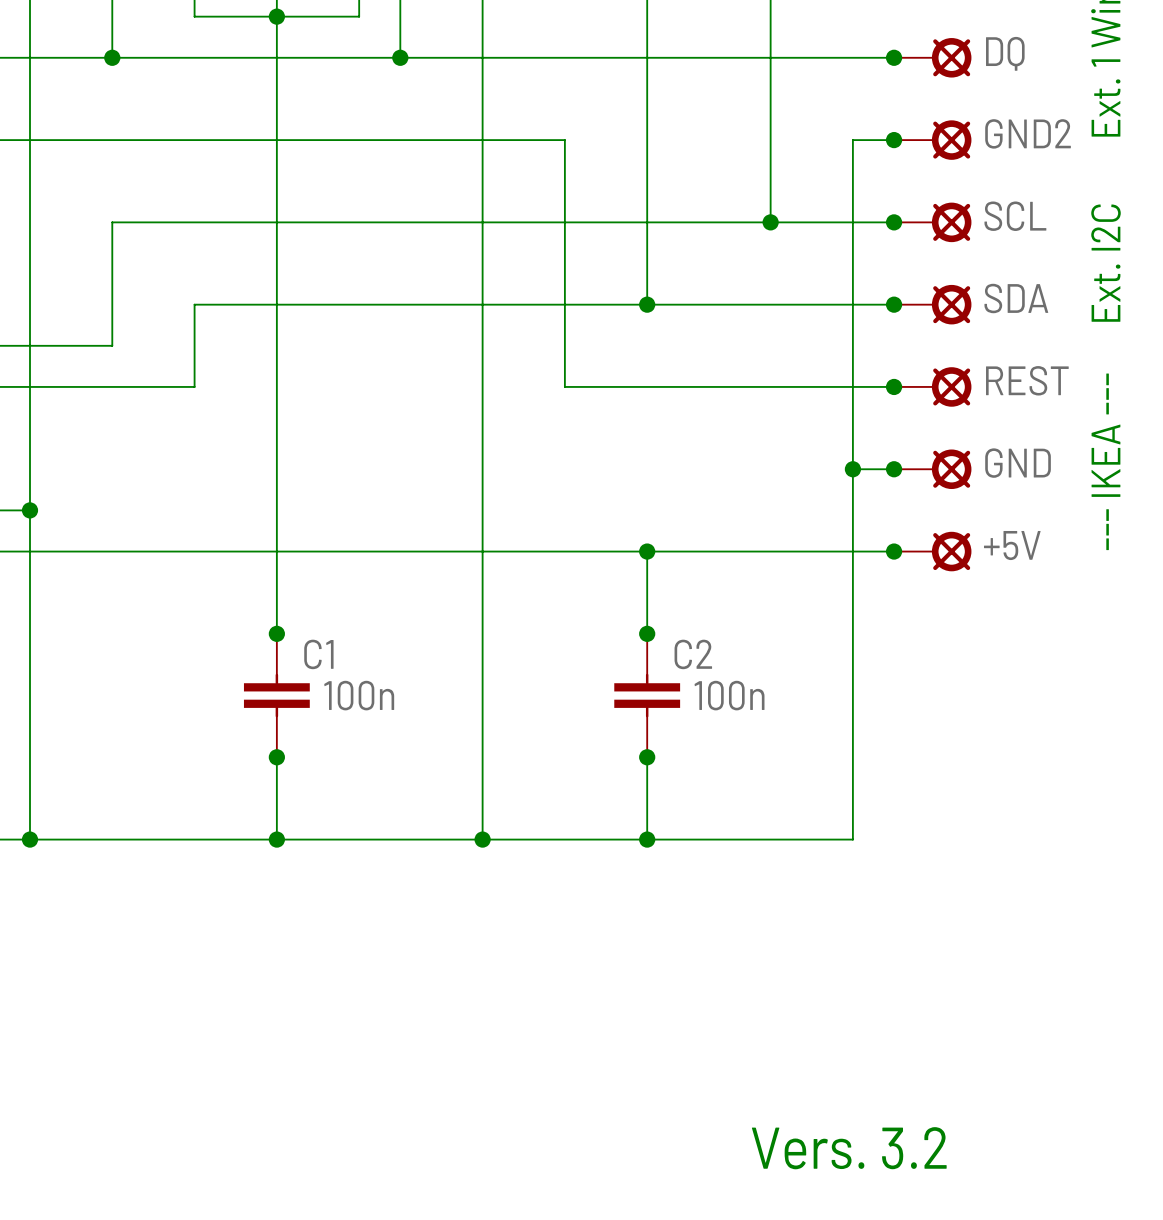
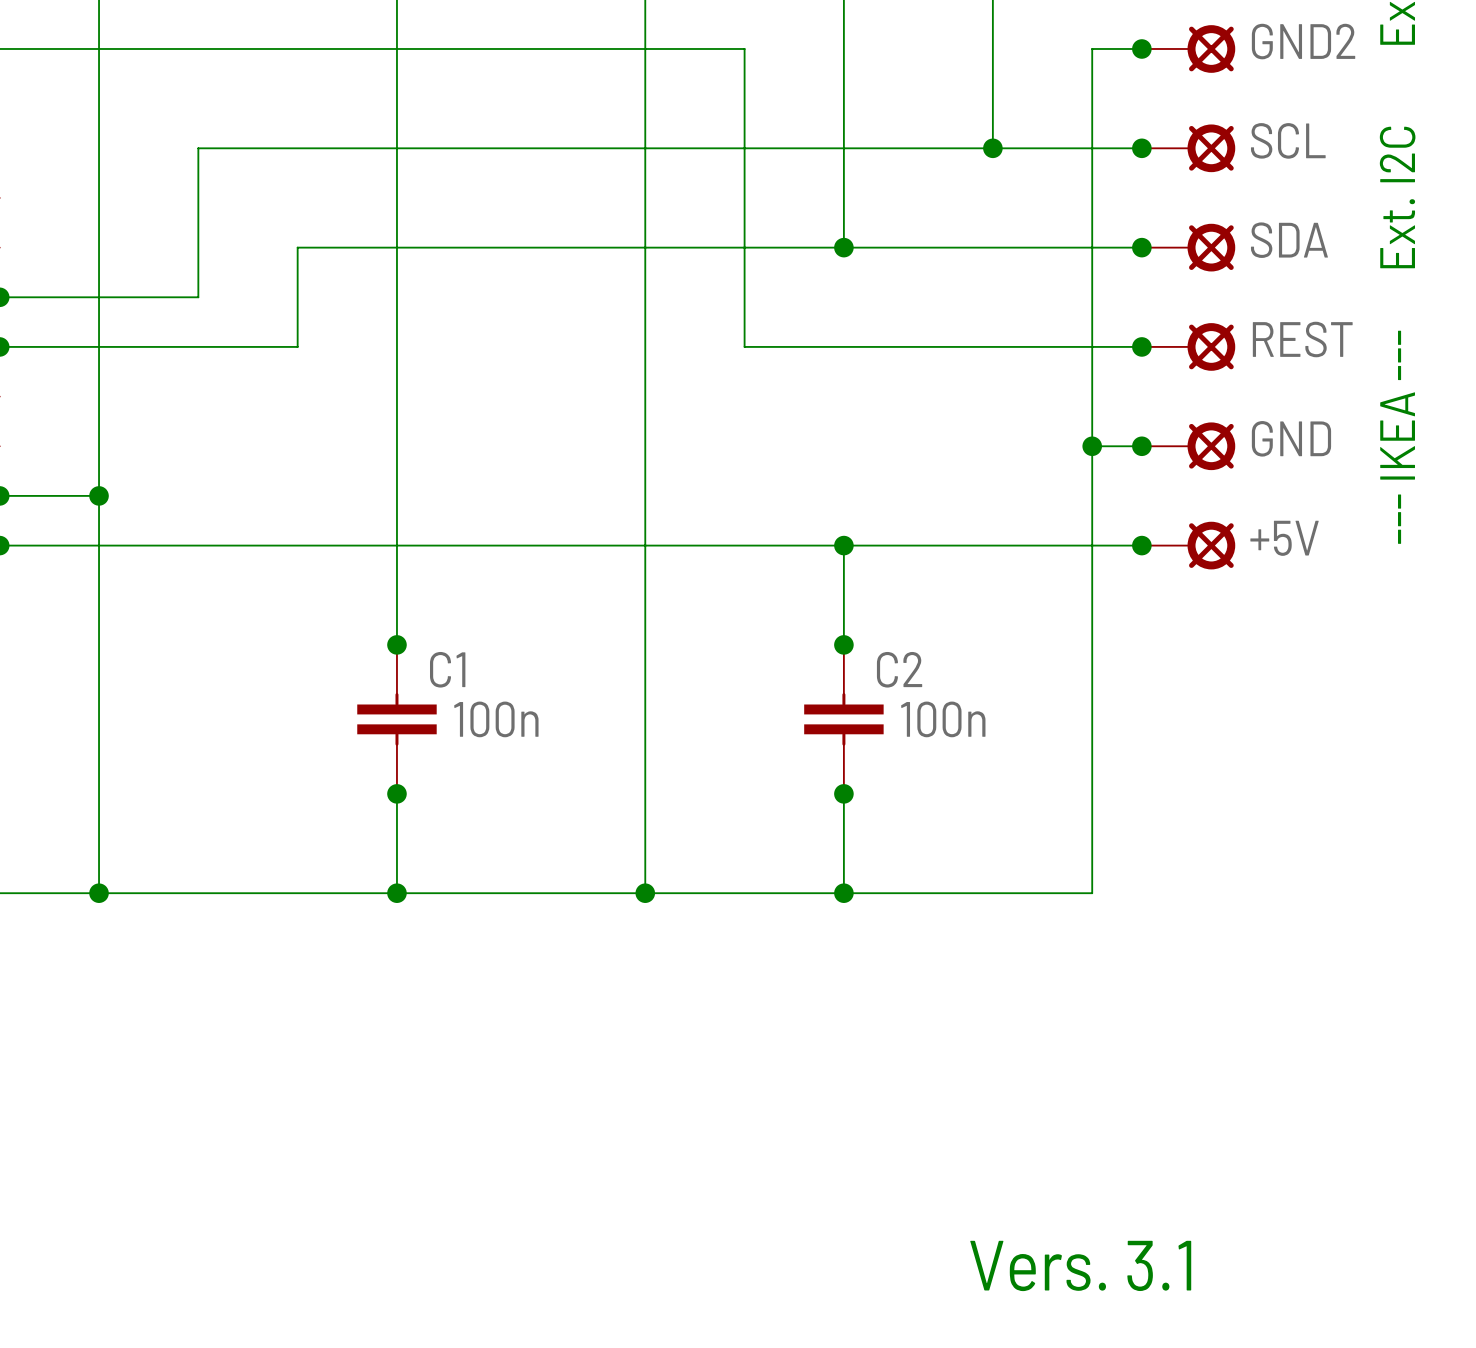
text: Vers. 3.2 (849, 1148) -> Vers. 3.1 (1080, 1265)

